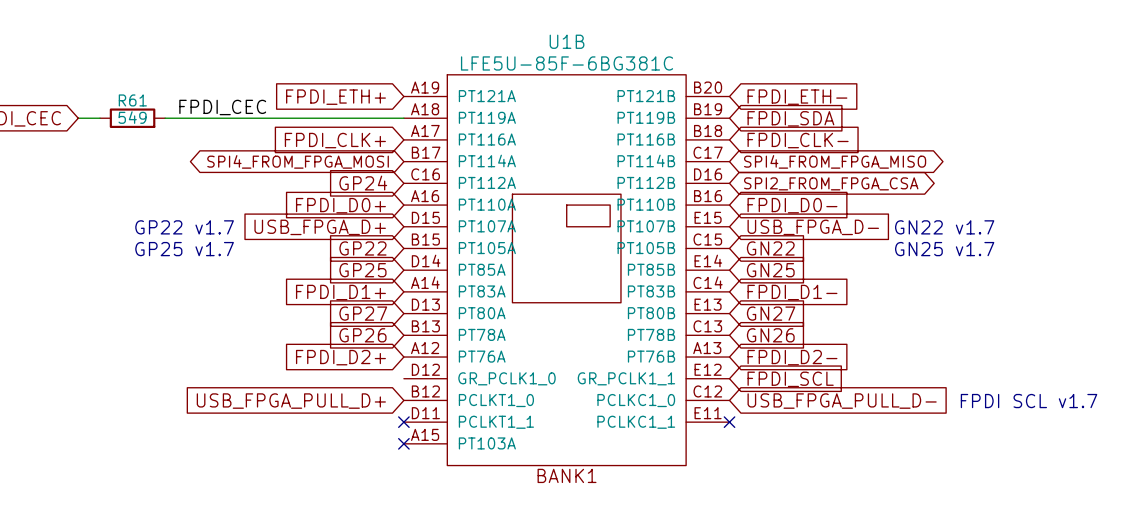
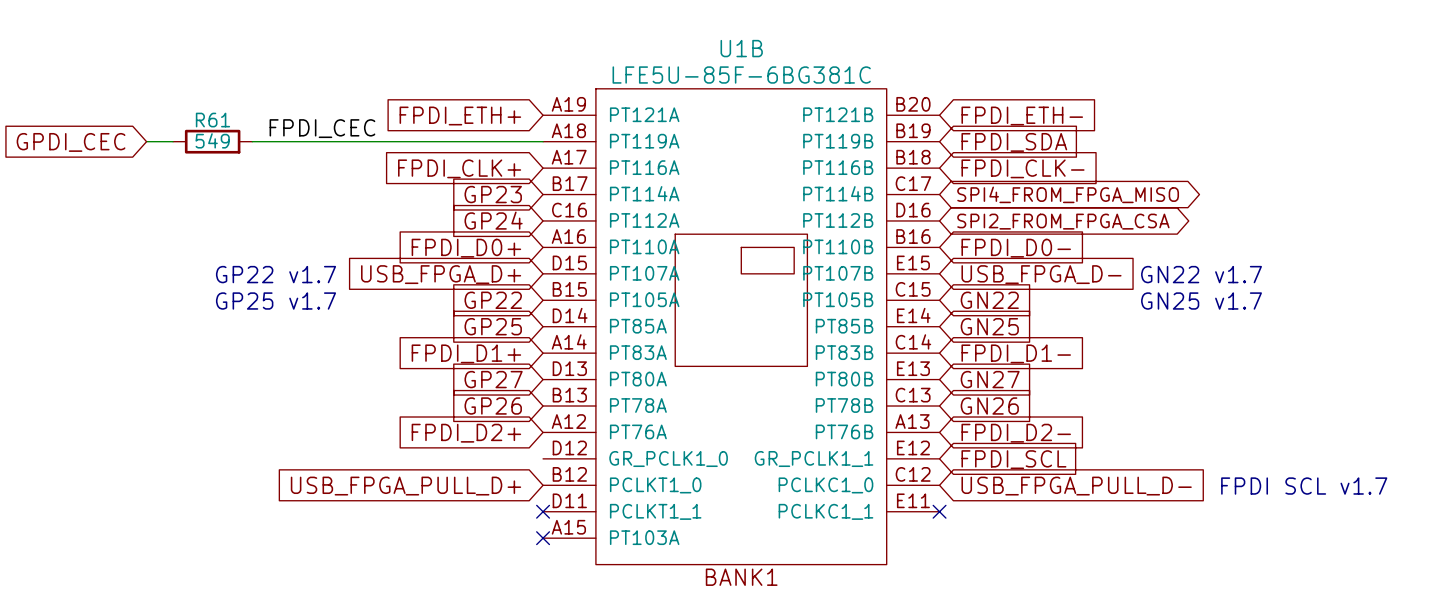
global label shape: bidirectional (298, 161) -> input (493, 194)
global label: SPI4_FROM_FPGA_MOSI (298, 161) -> GP23 (493, 194)

